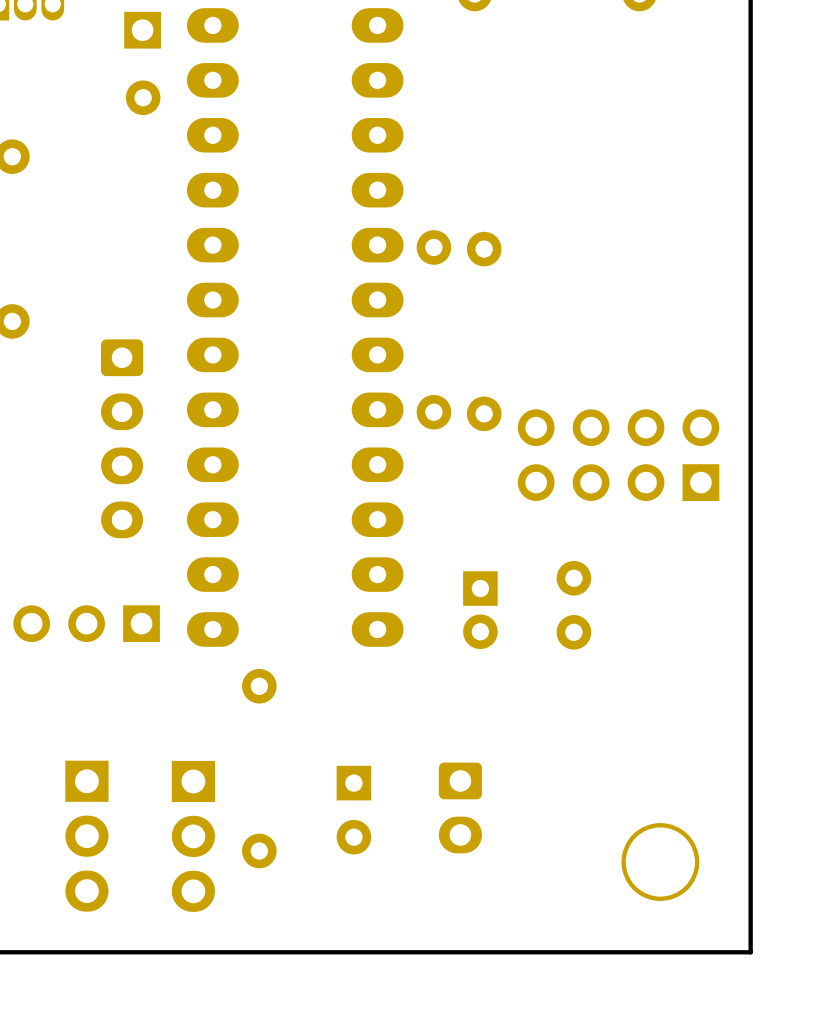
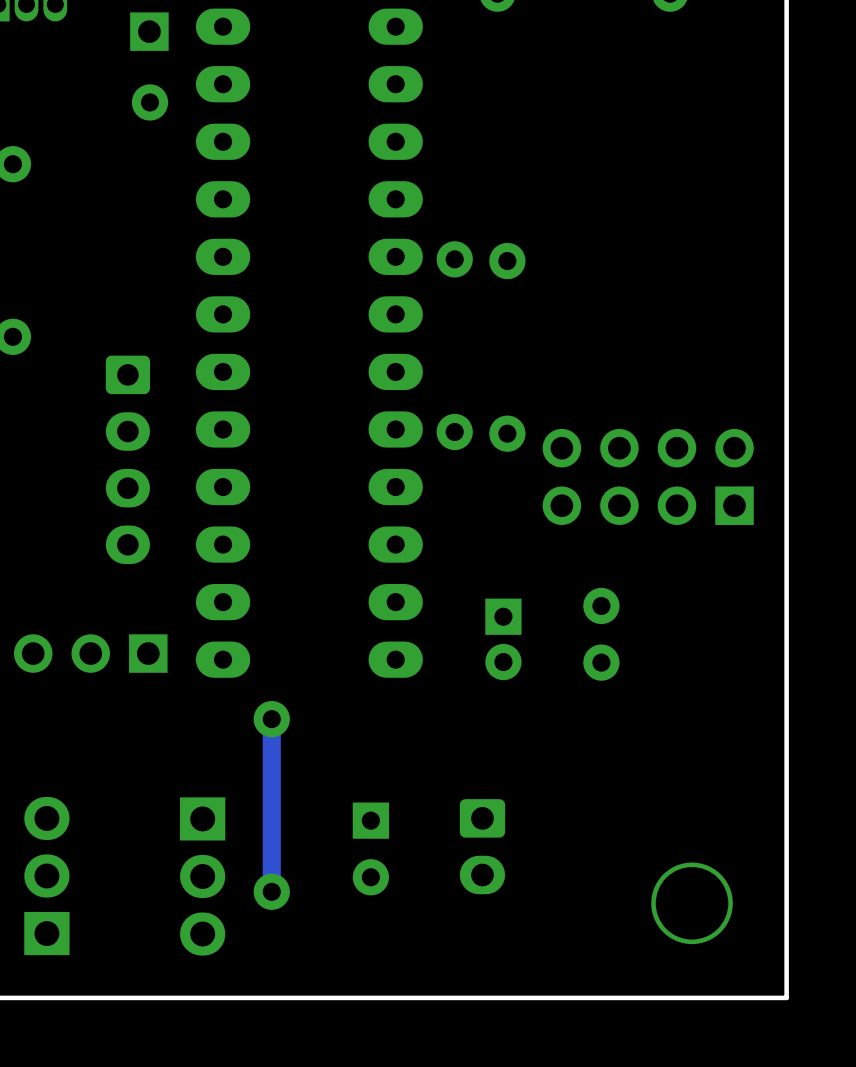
track: none -> (271, 719) (271, 891)
part rotation: 0° (86, 836) -> 180° (46, 876)

